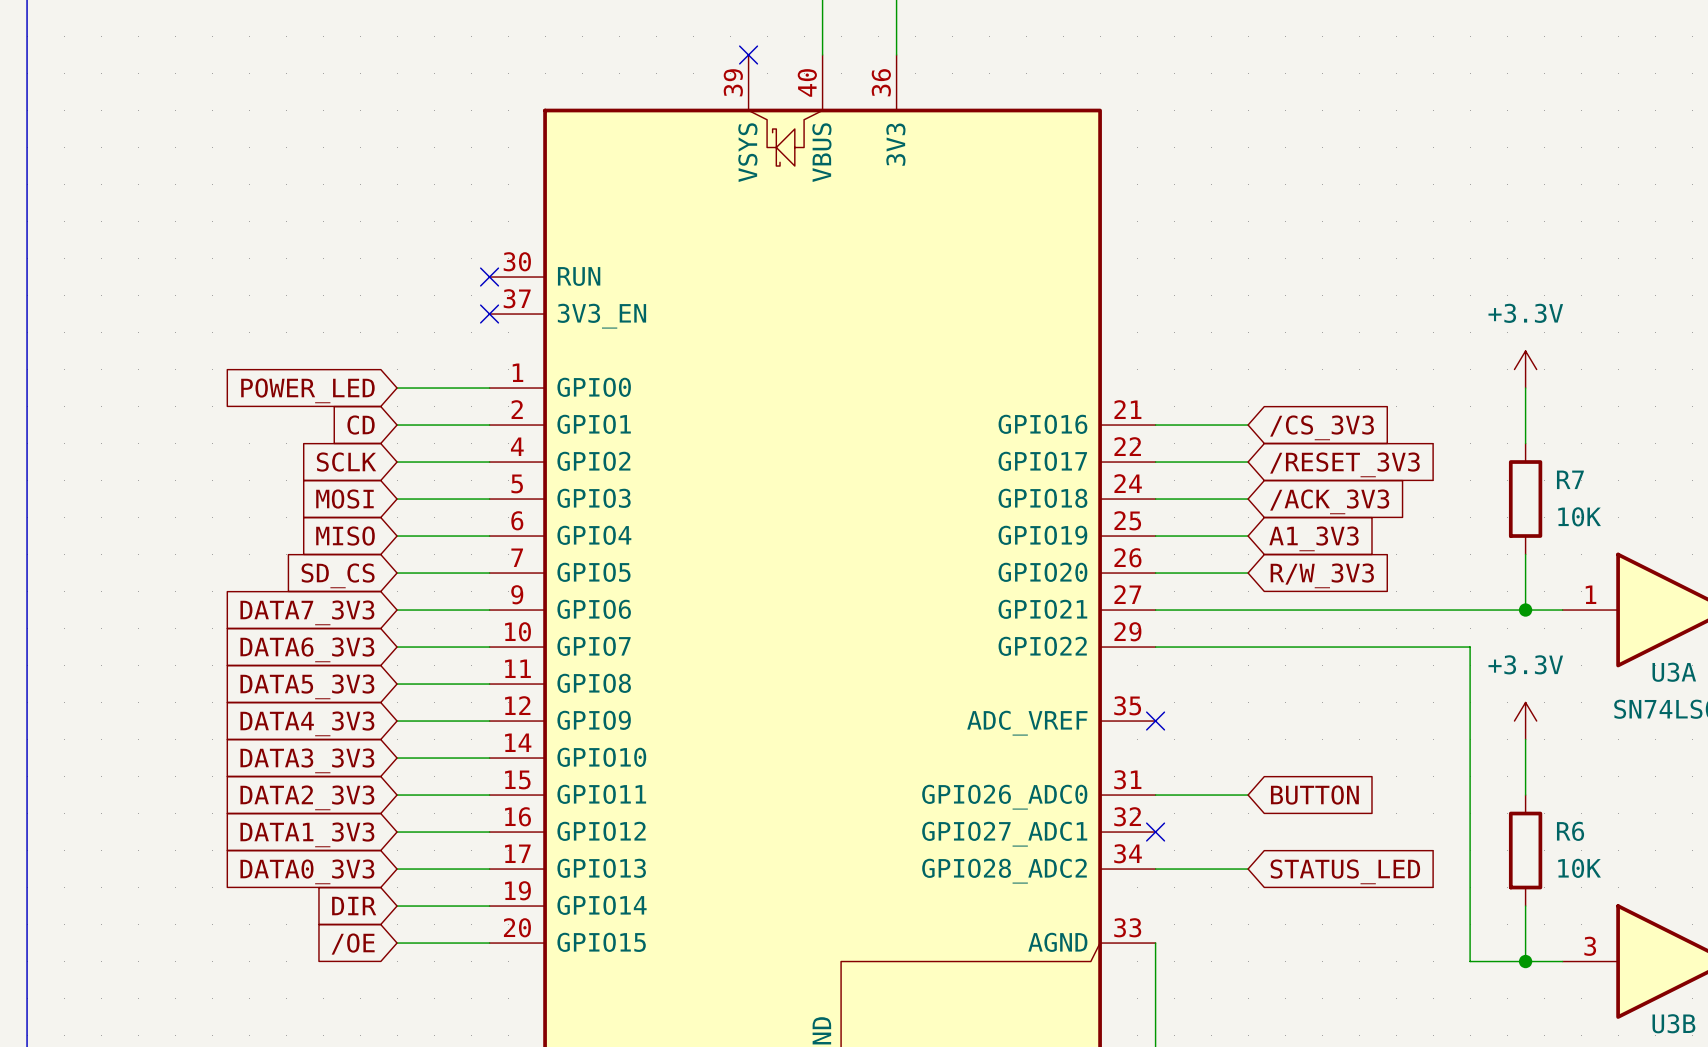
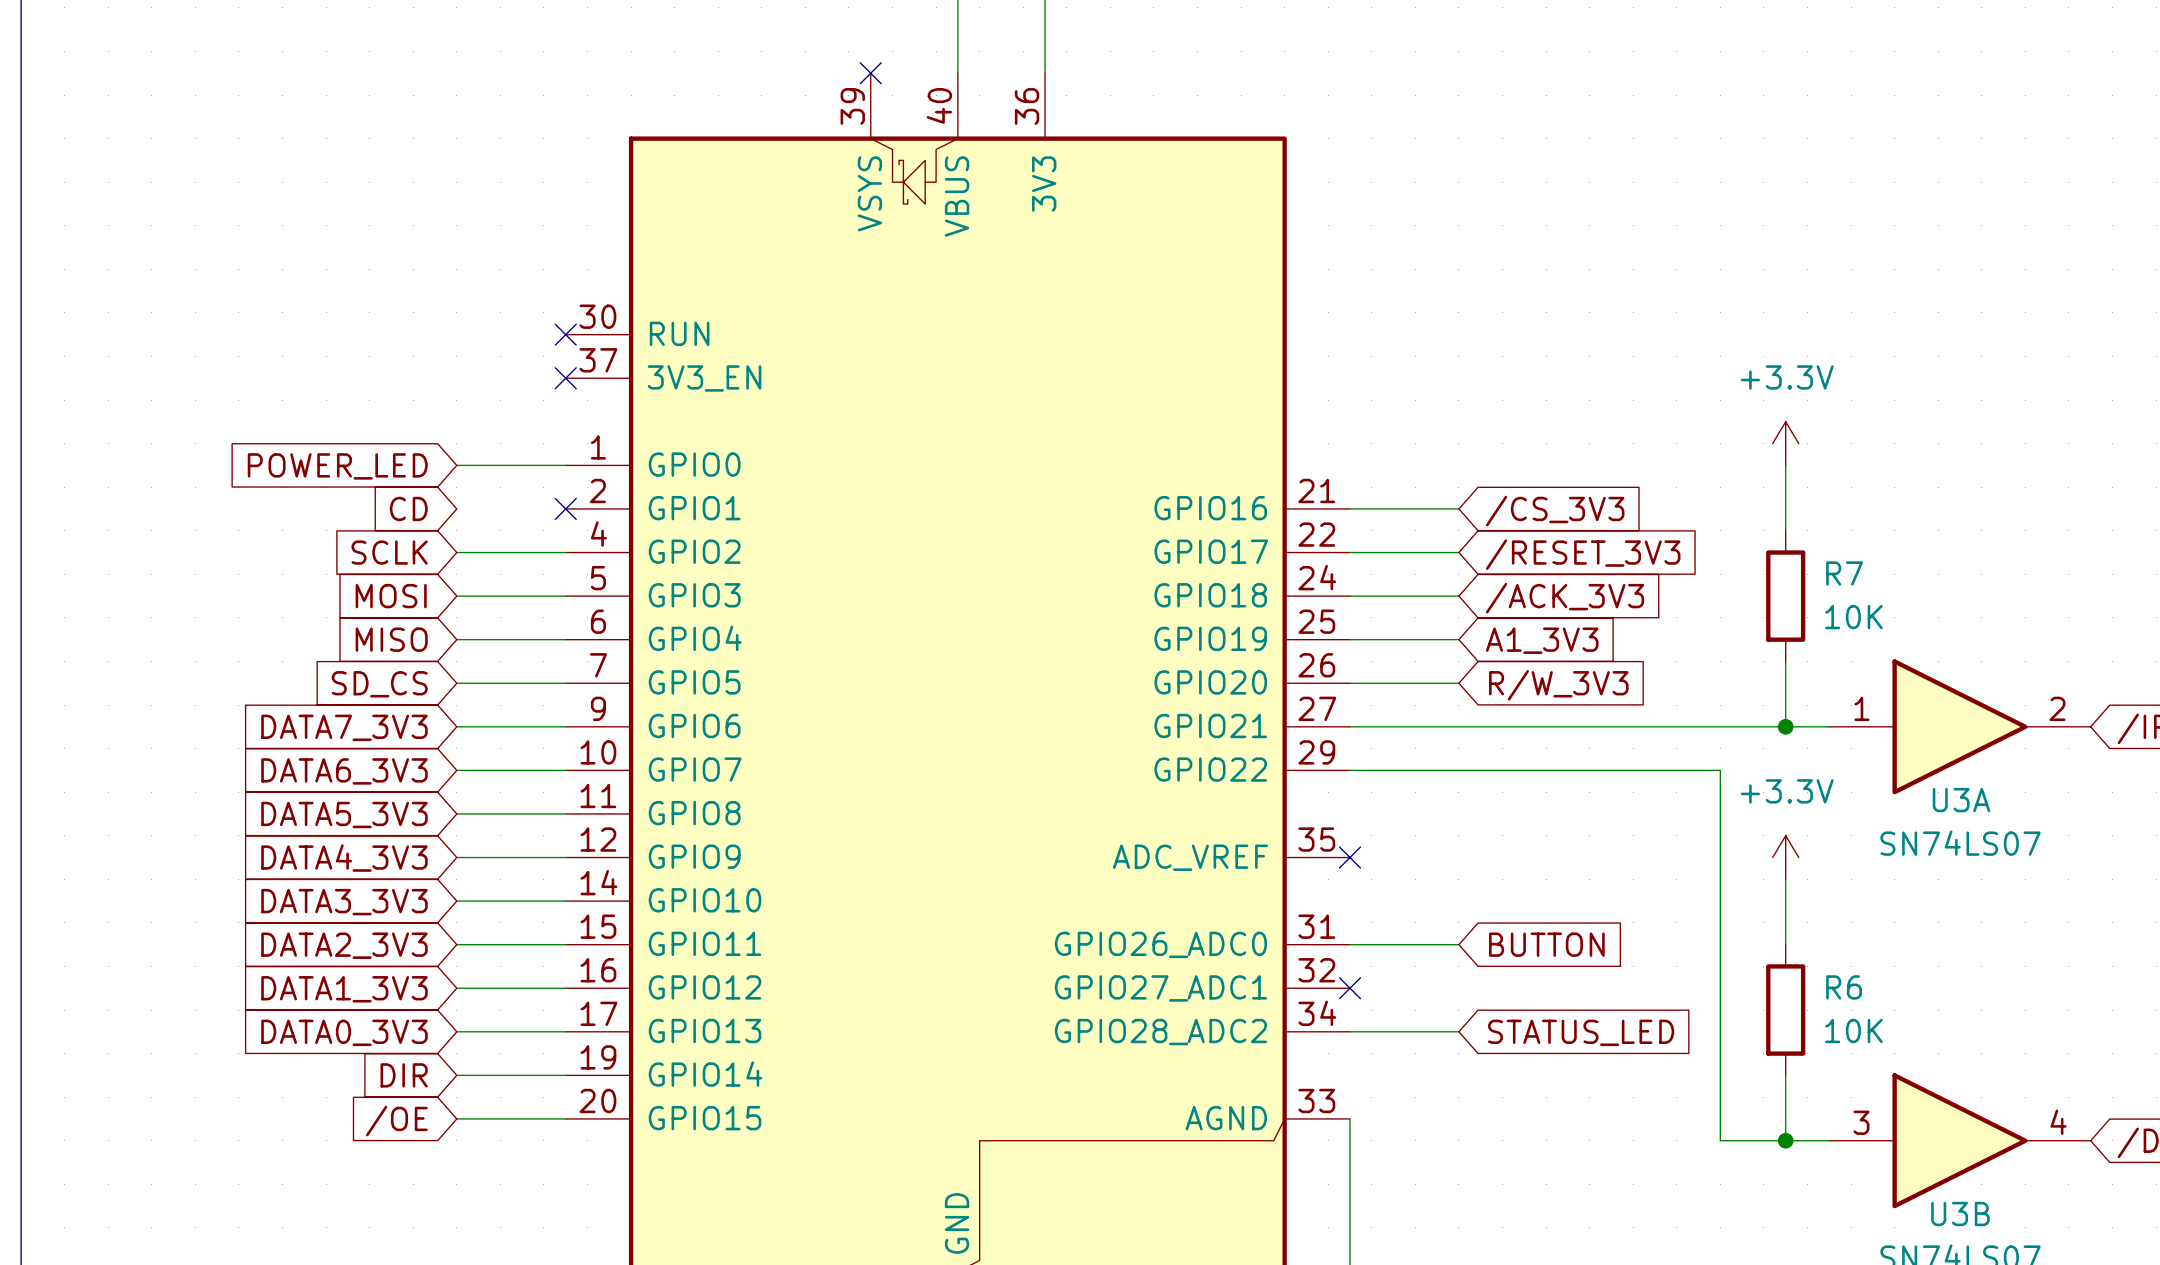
wire: (397, 425) (489, 425) -> none
no-connect mark: none -> (565, 508)

